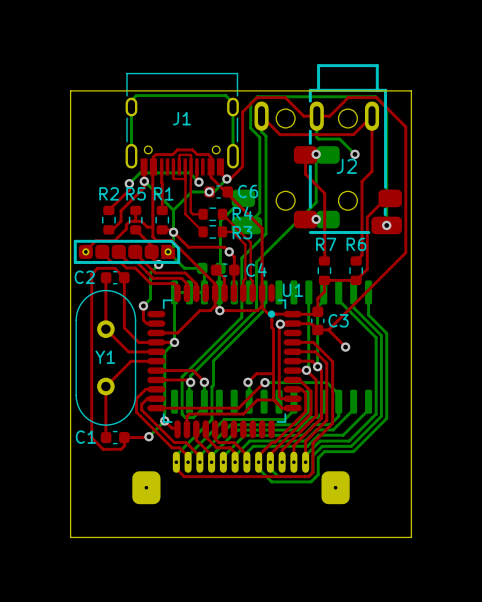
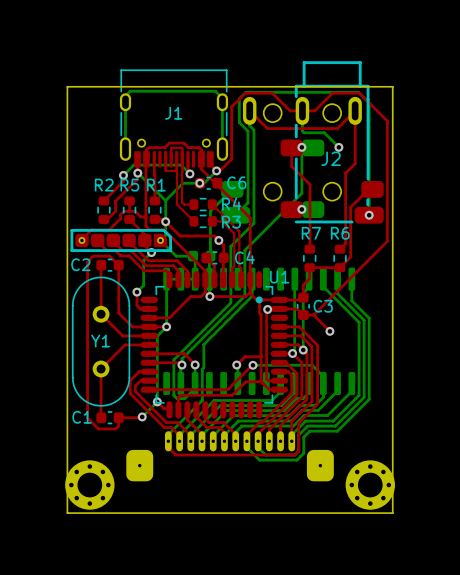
part: none -> (89, 485)
part: none -> (370, 485)

